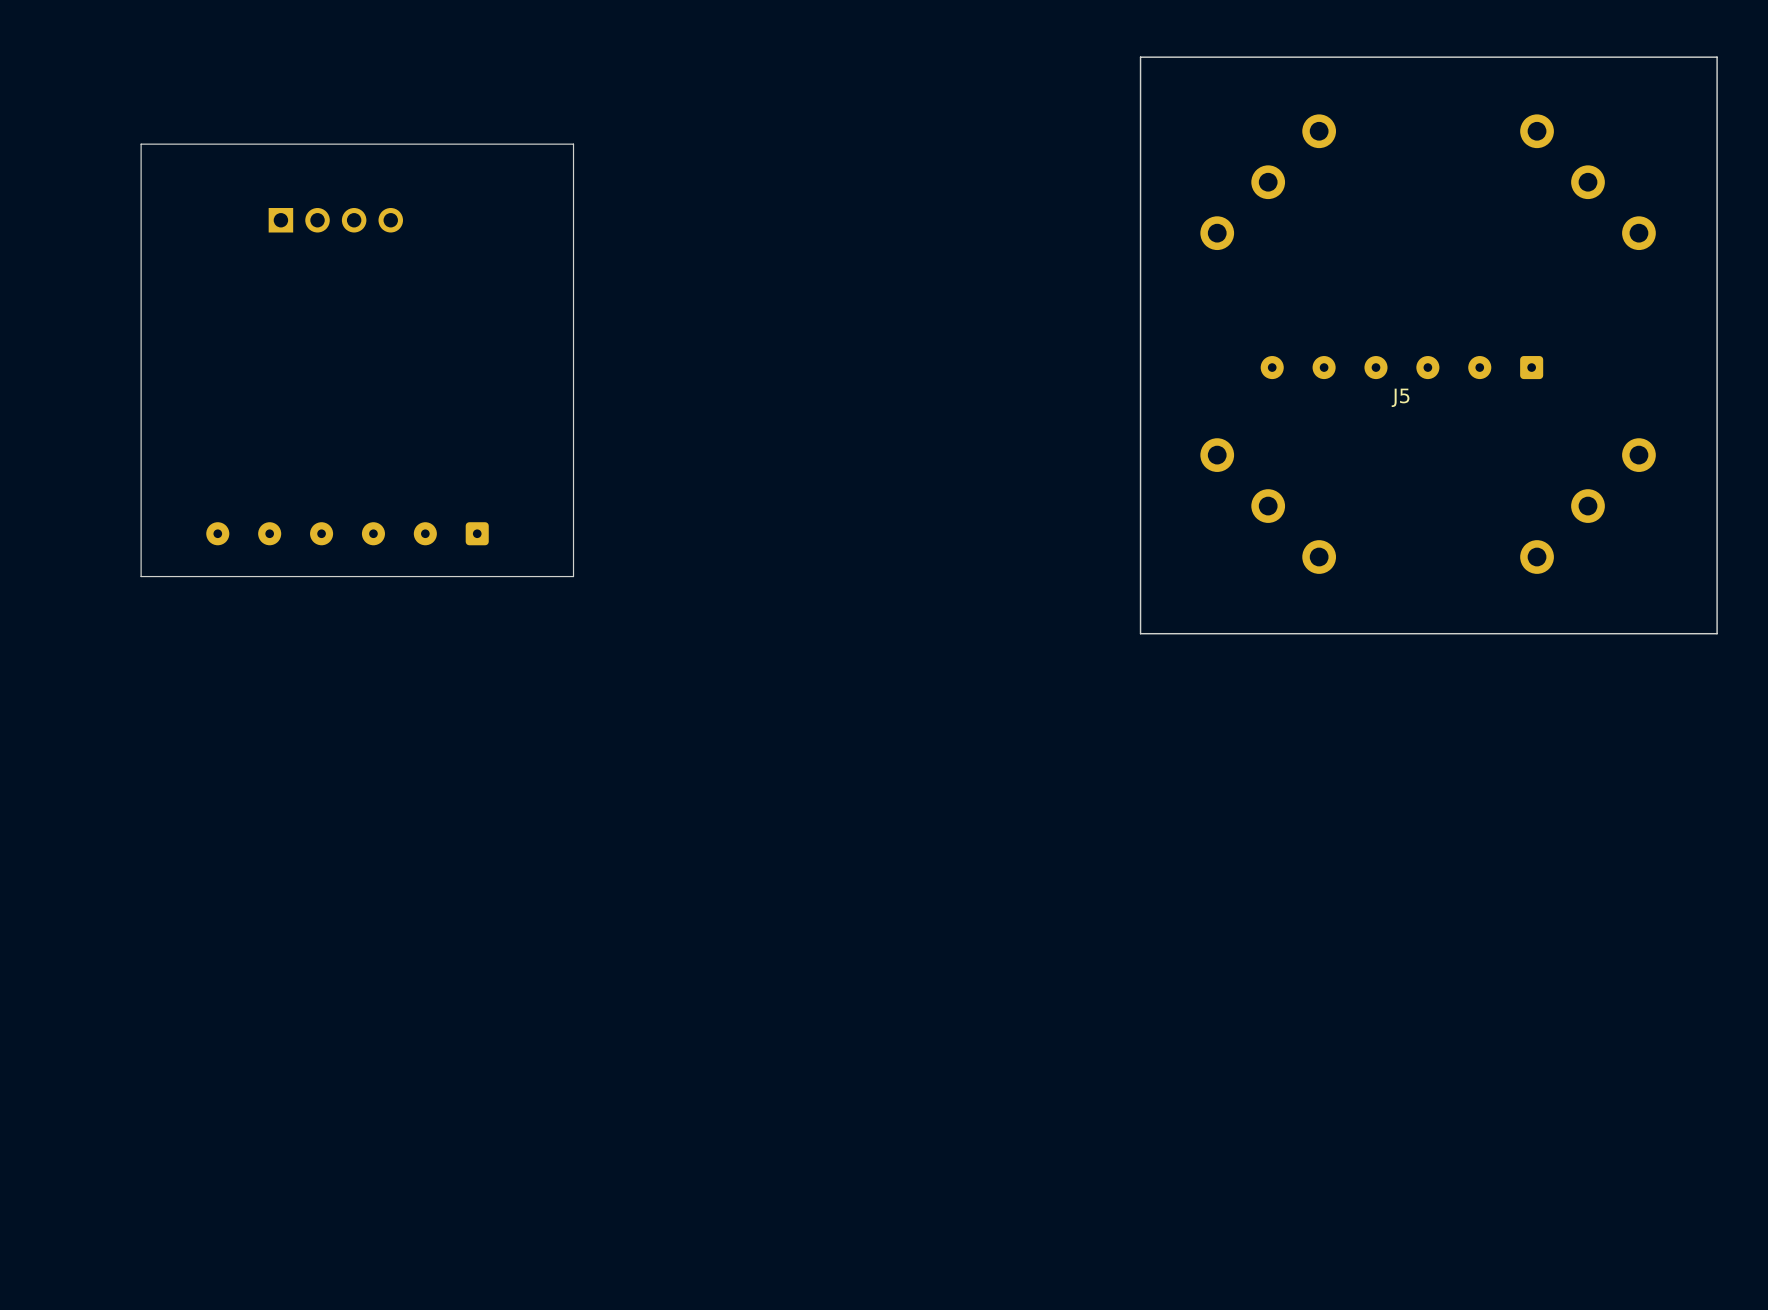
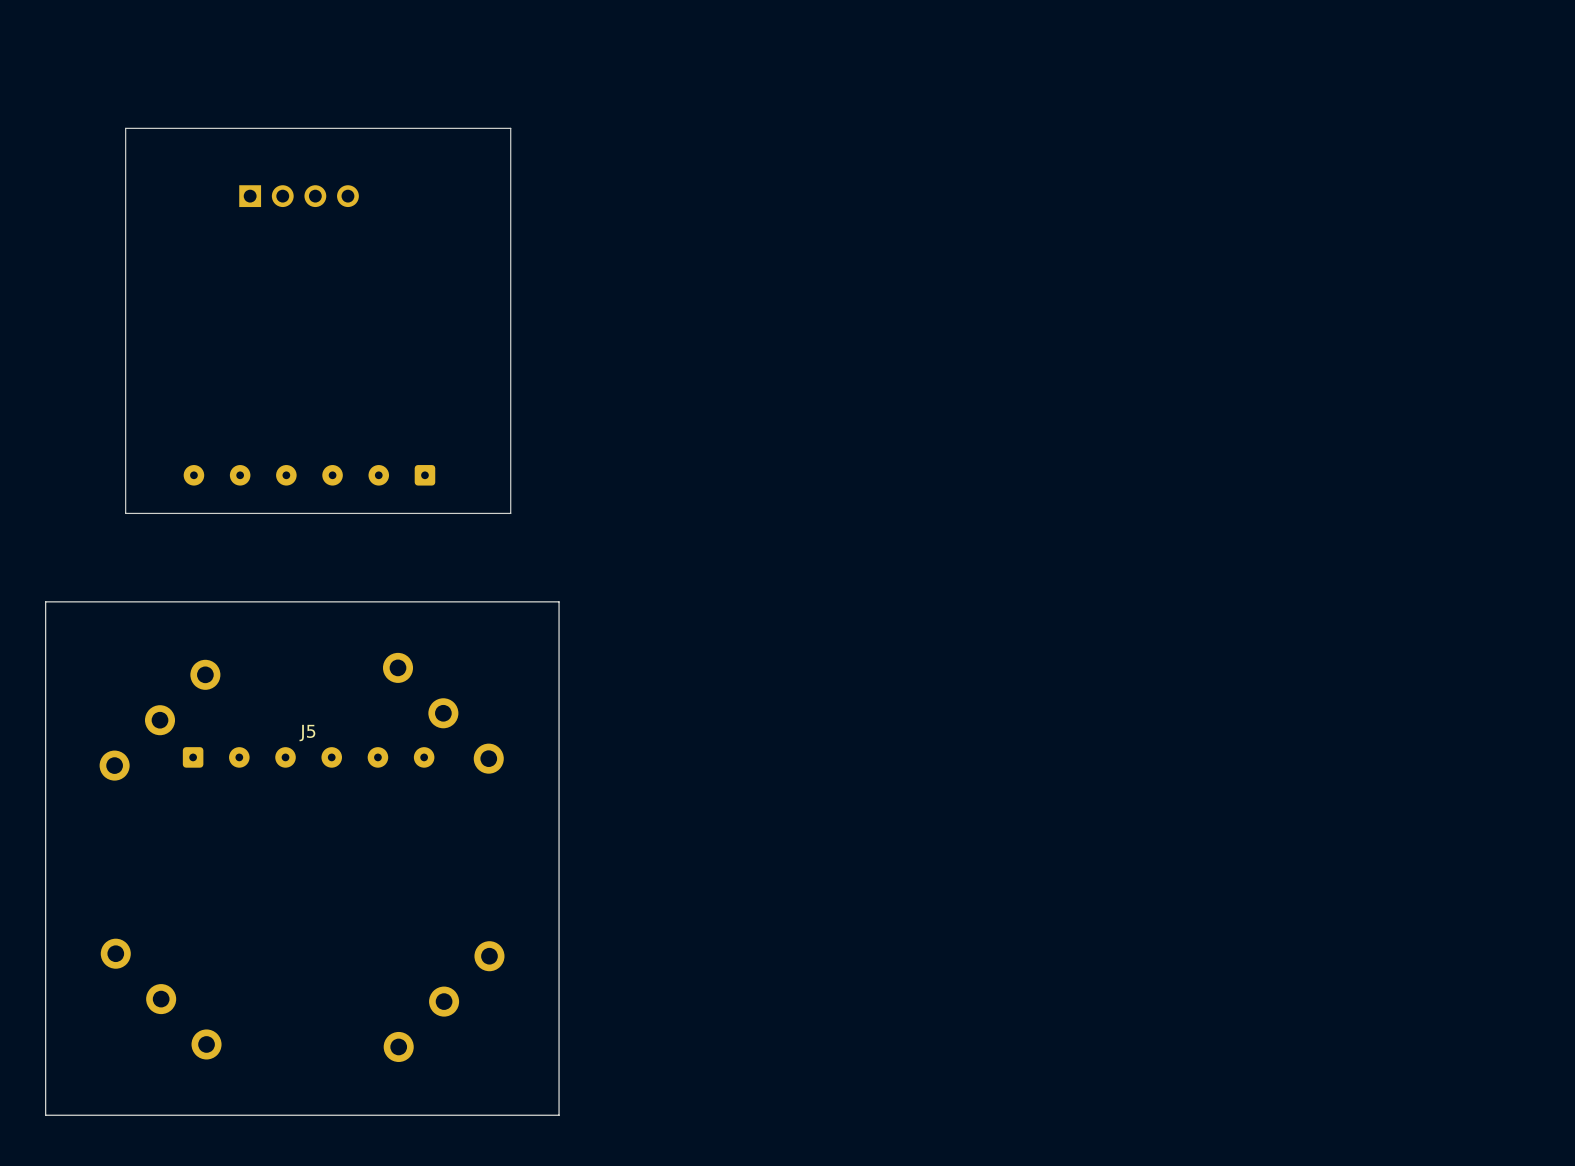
board edge: (1717, 57) (1140, 57) (1140, 633) (1717, 633) (1717, 57) -> none
part: (1268, 182) -> none
part: (1588, 182) -> none
J5 rotation: 0° (1401, 367) -> 180° (308, 757)
J5 position: (1401, 367) -> (308, 757)
part: (1268, 506) -> none
part: (1588, 506) -> none
board edge: none -> (559, 601) (45, 601) (45, 1115) (559, 1115) (559, 601)
part: none -> (443, 713)
part: none -> (160, 720)
part: none -> (161, 999)
part: none -> (444, 1001)

